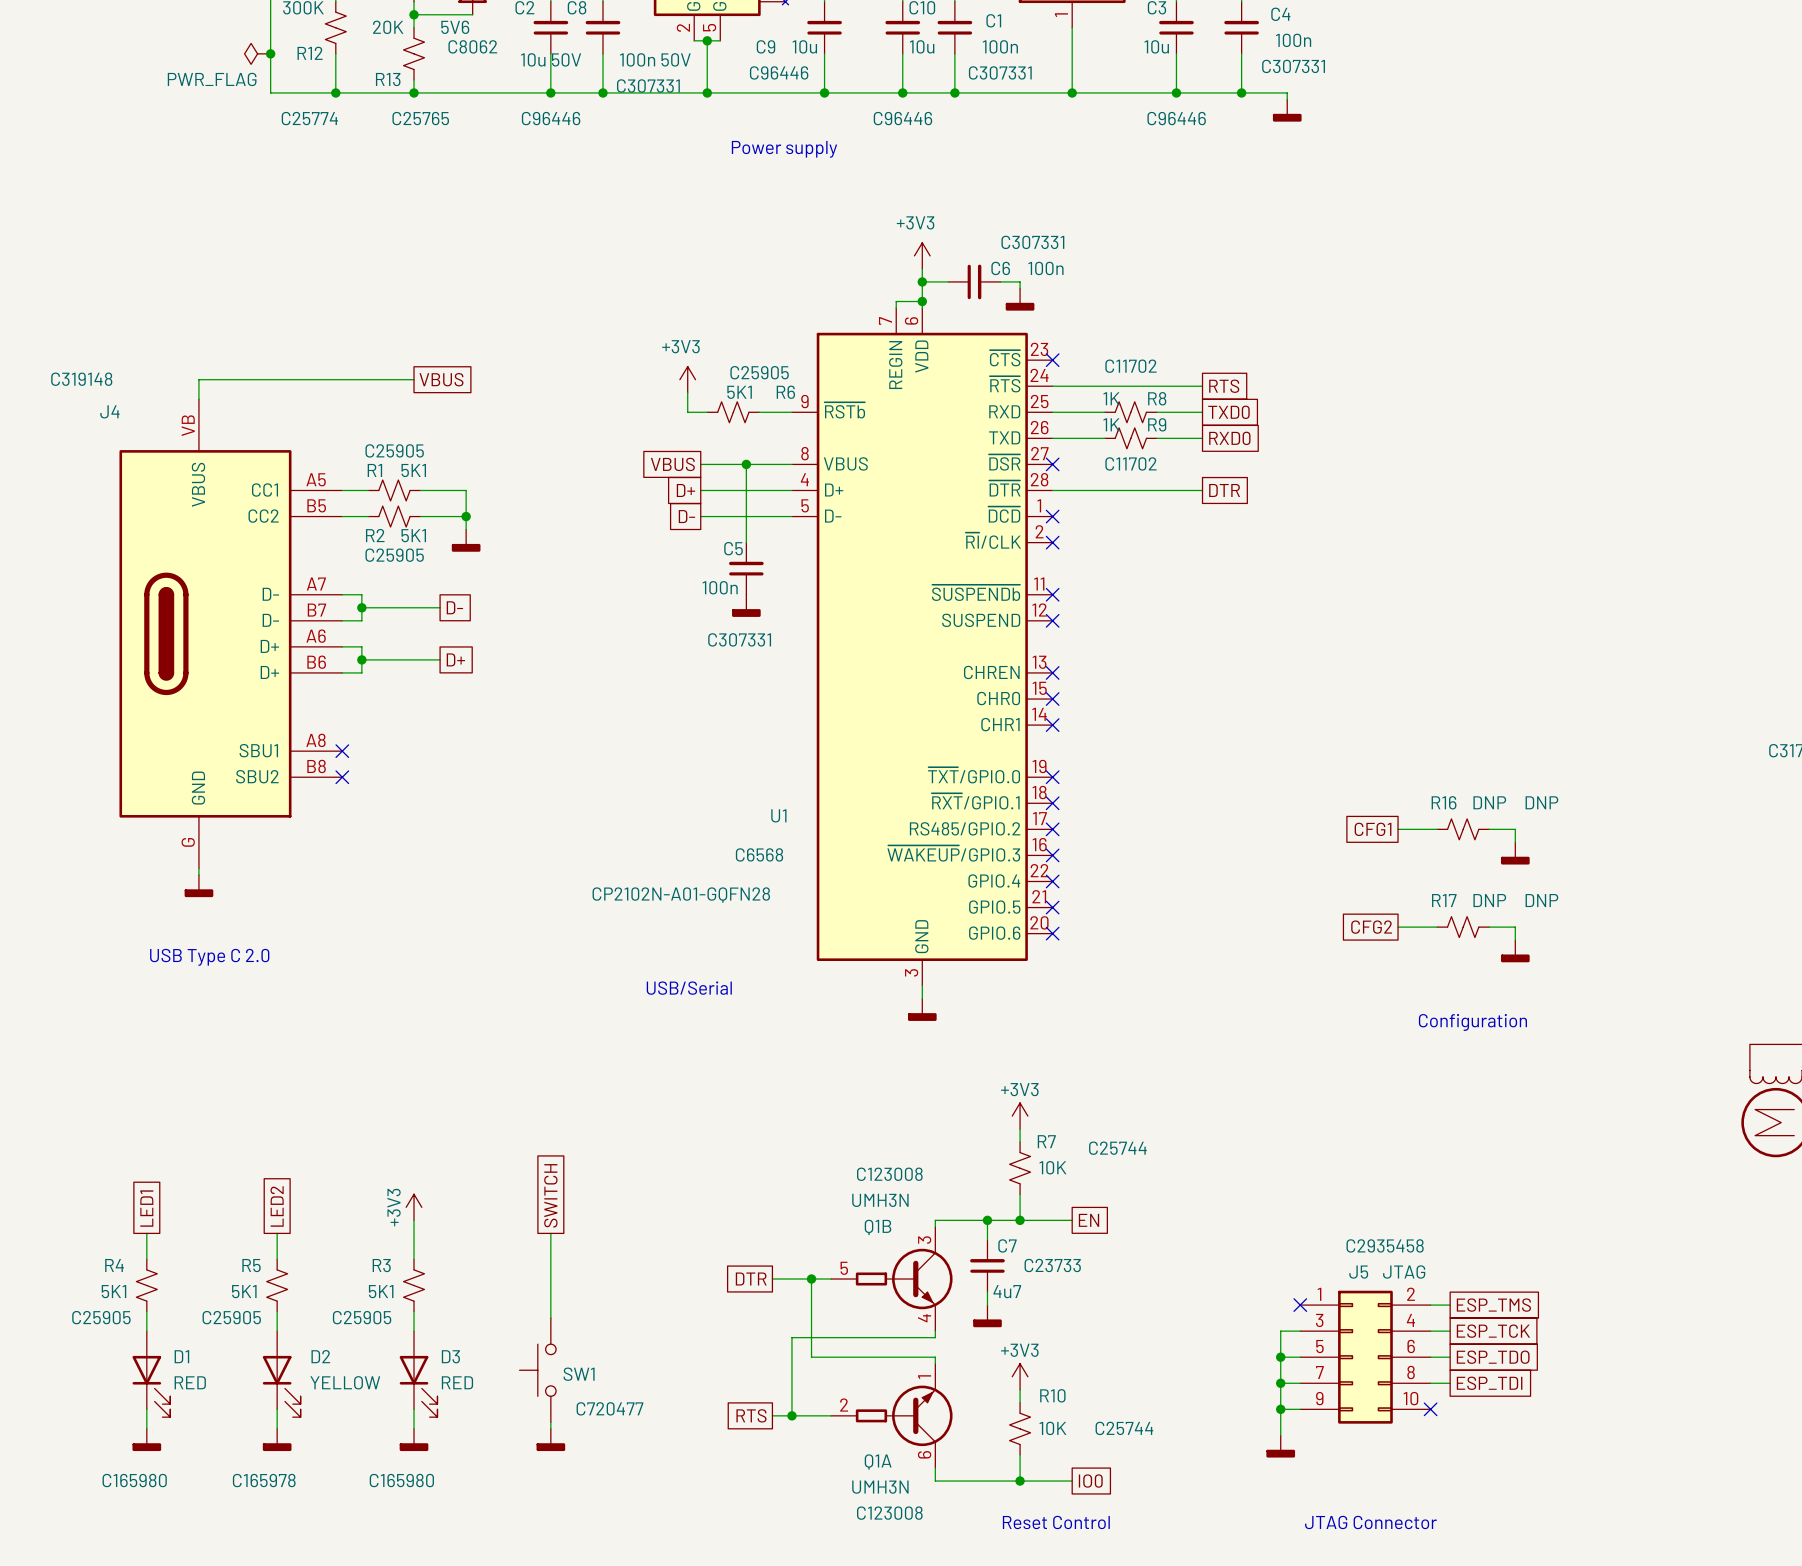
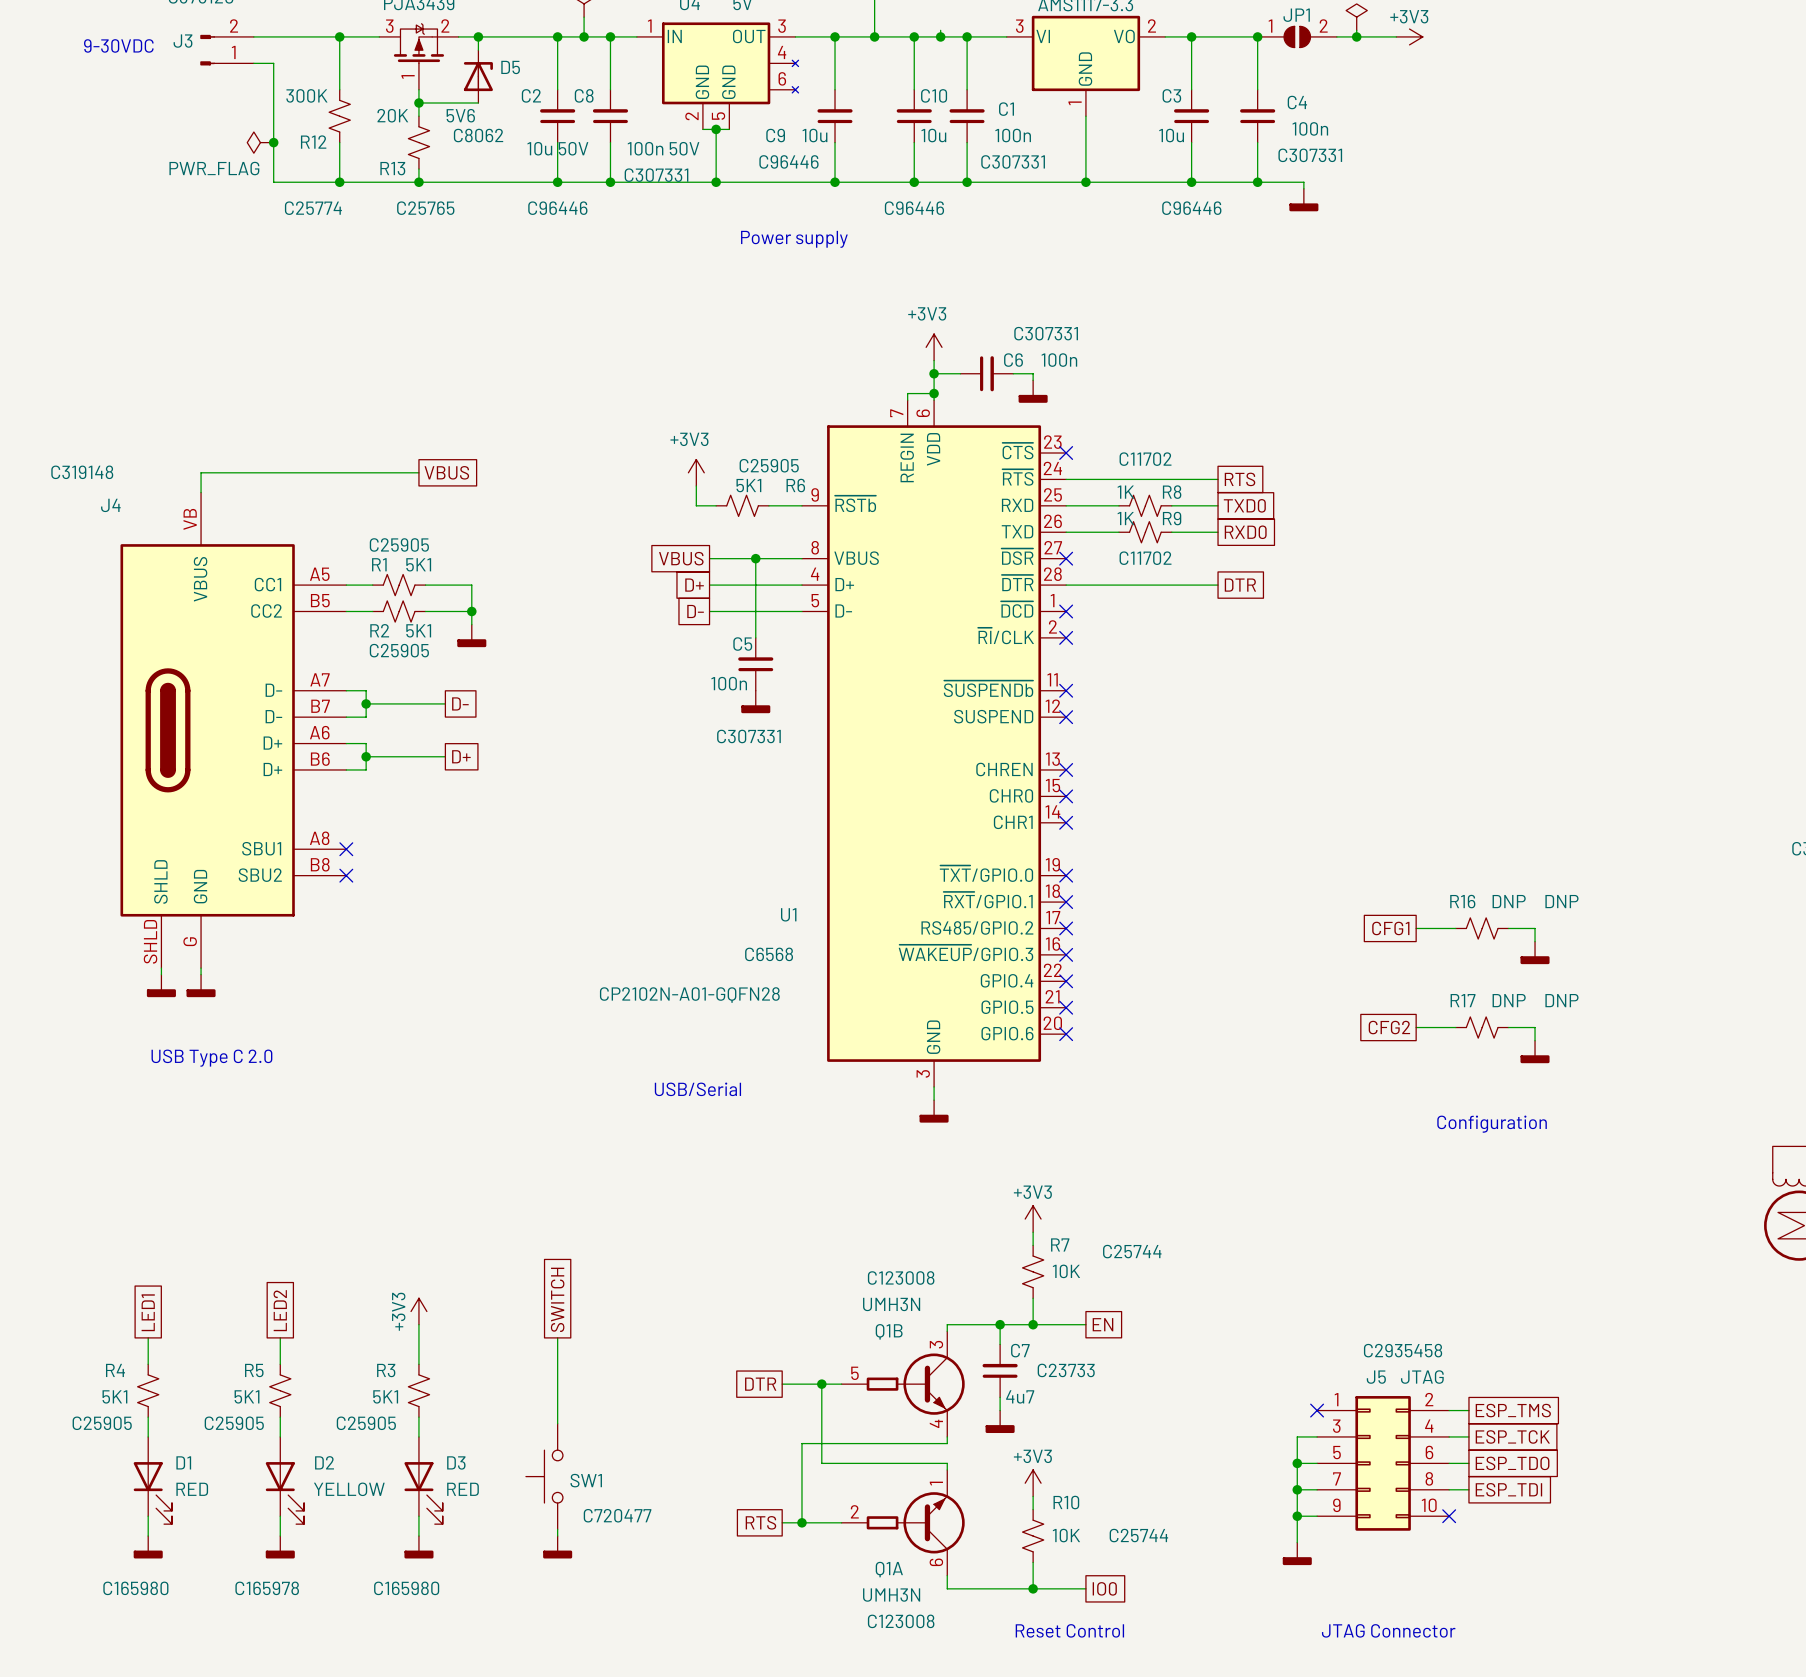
J4 symbol: [119, 399, 343, 869] -> [120, 492, 347, 969]
wire: none -> (161, 968) (161, 974)
power symbol: none -> (161, 985)

